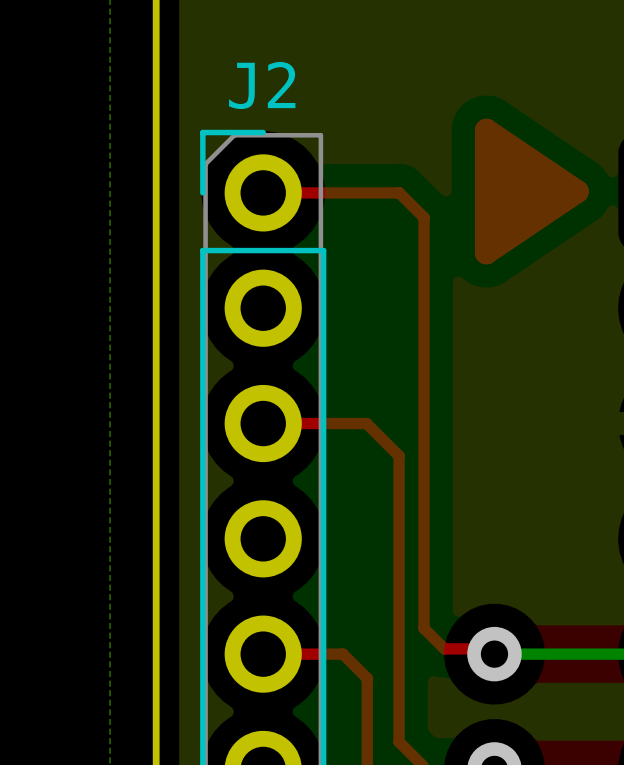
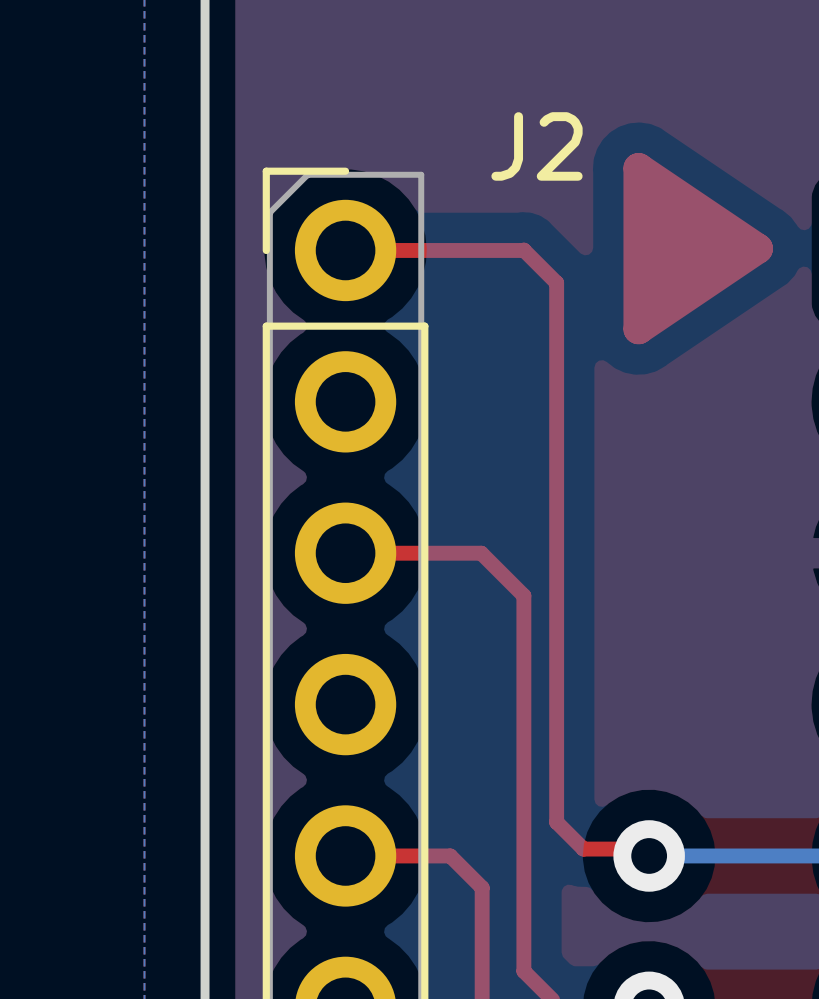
J2 name position: J2 (262, 85) -> J2 (536, 146)

